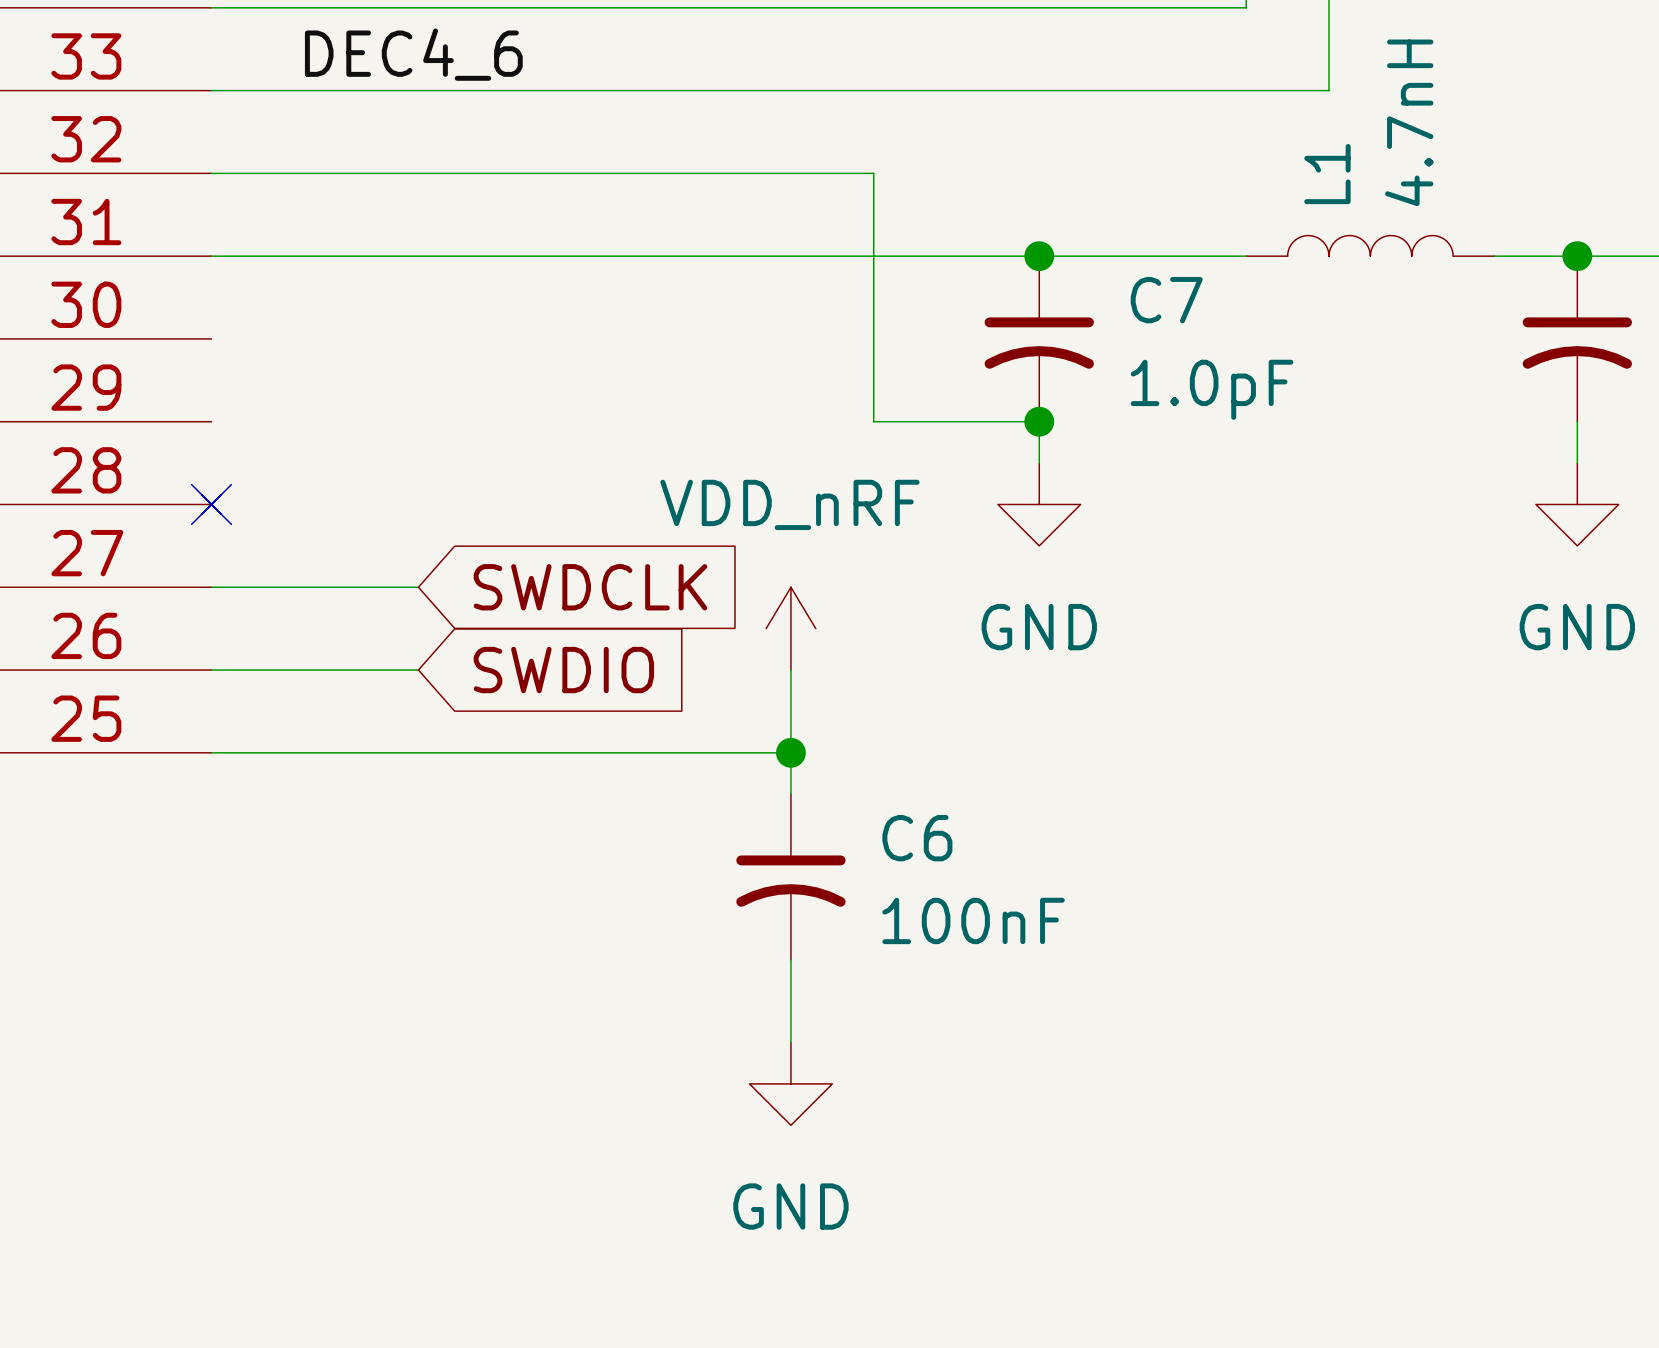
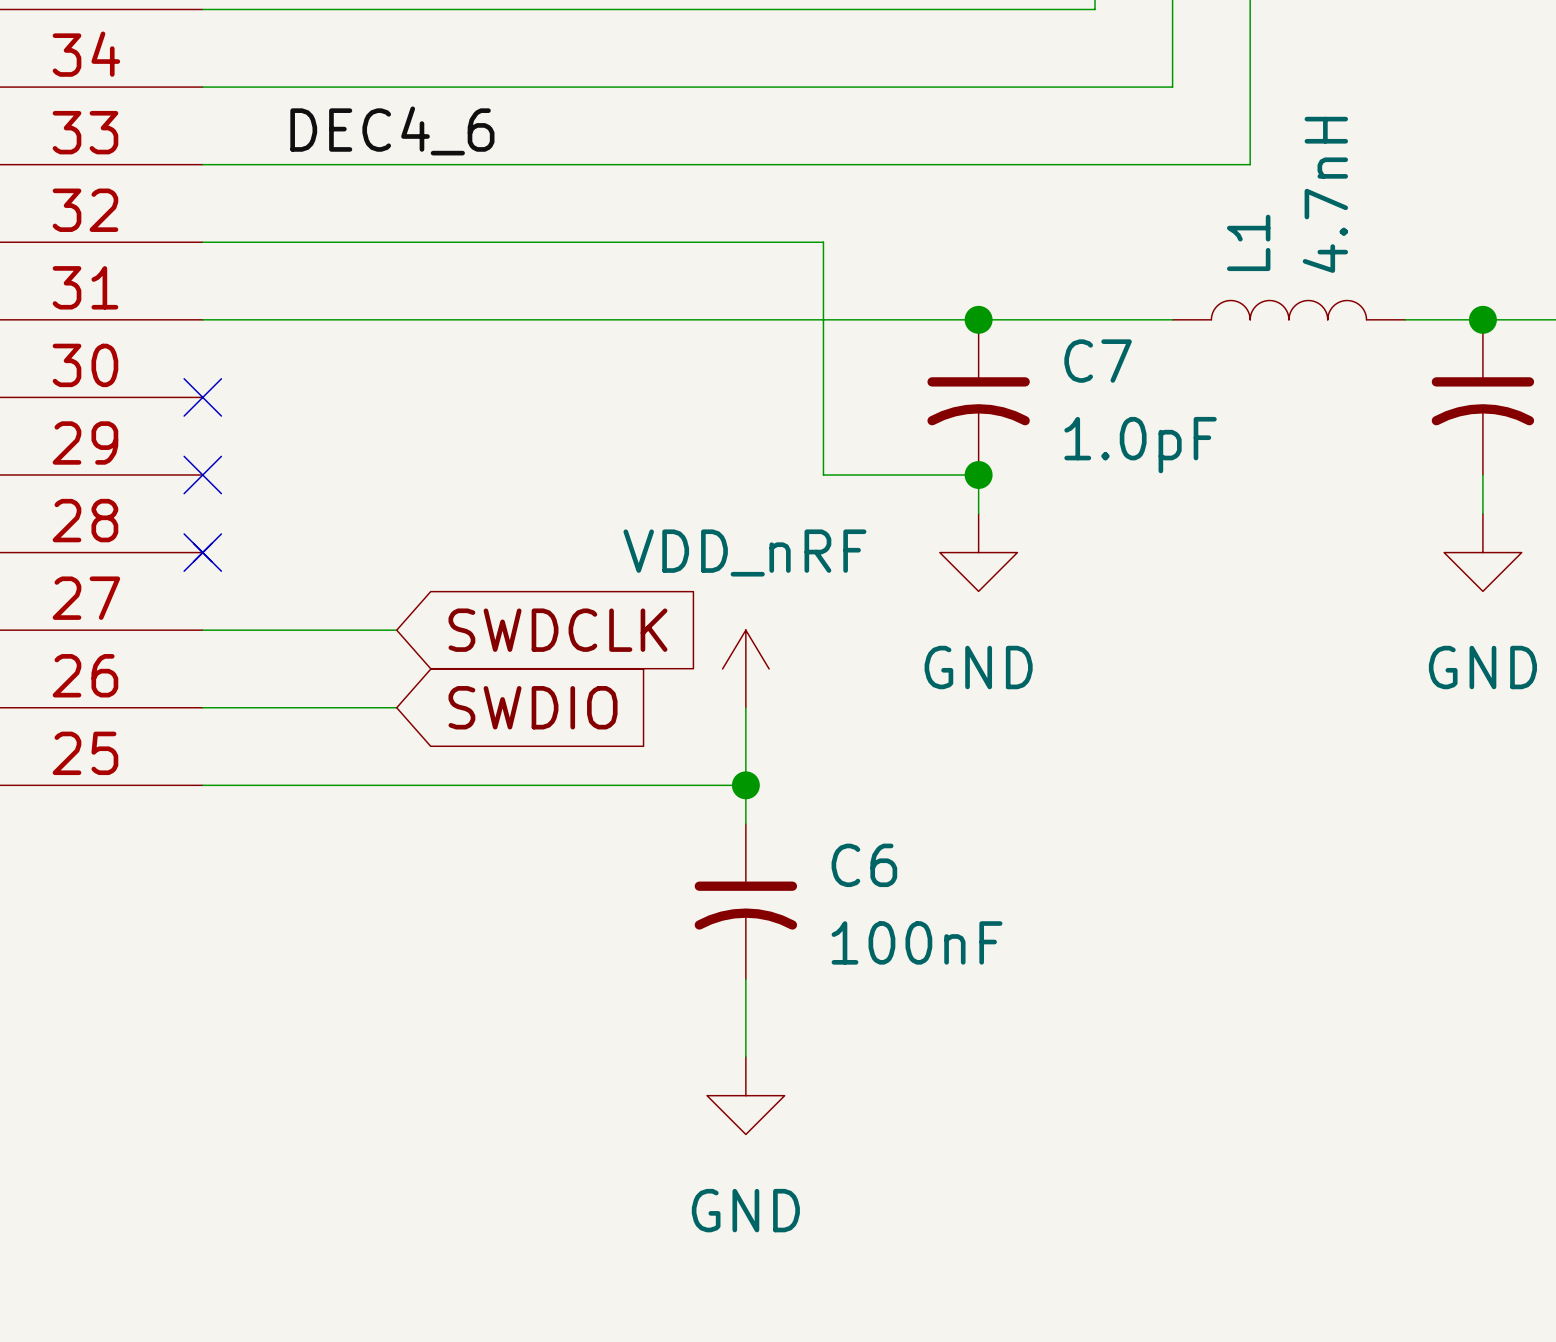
no-connect mark: none -> (202, 397)
no-connect mark: none -> (202, 475)

